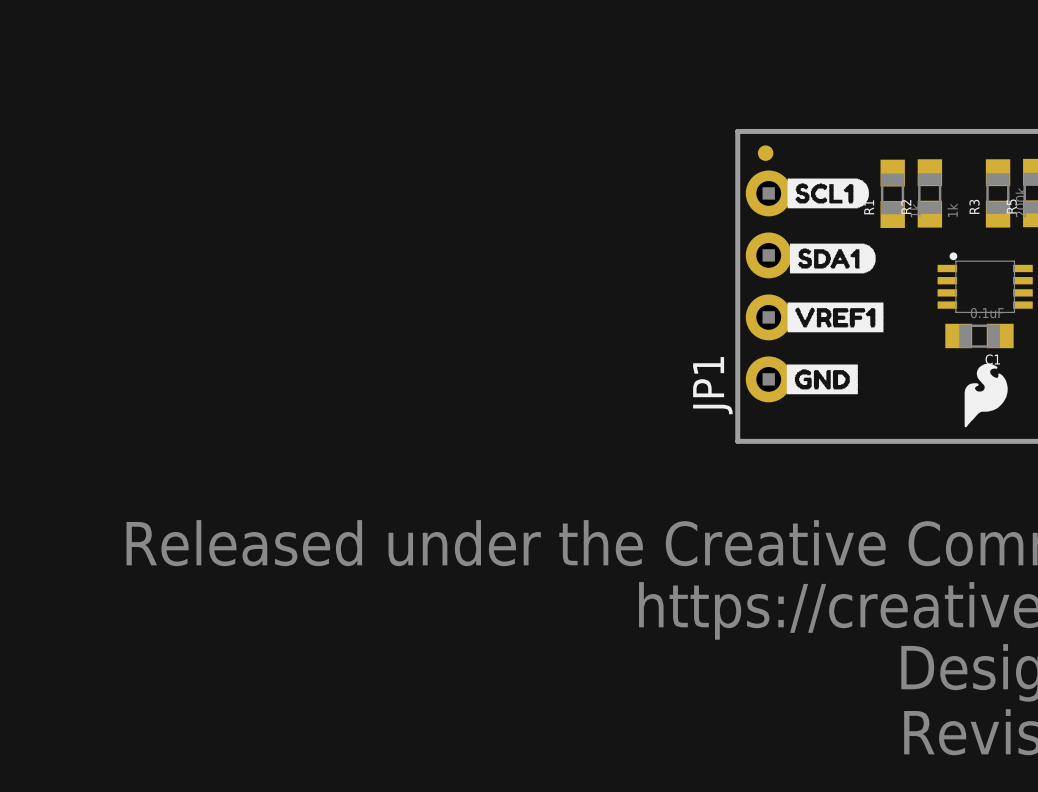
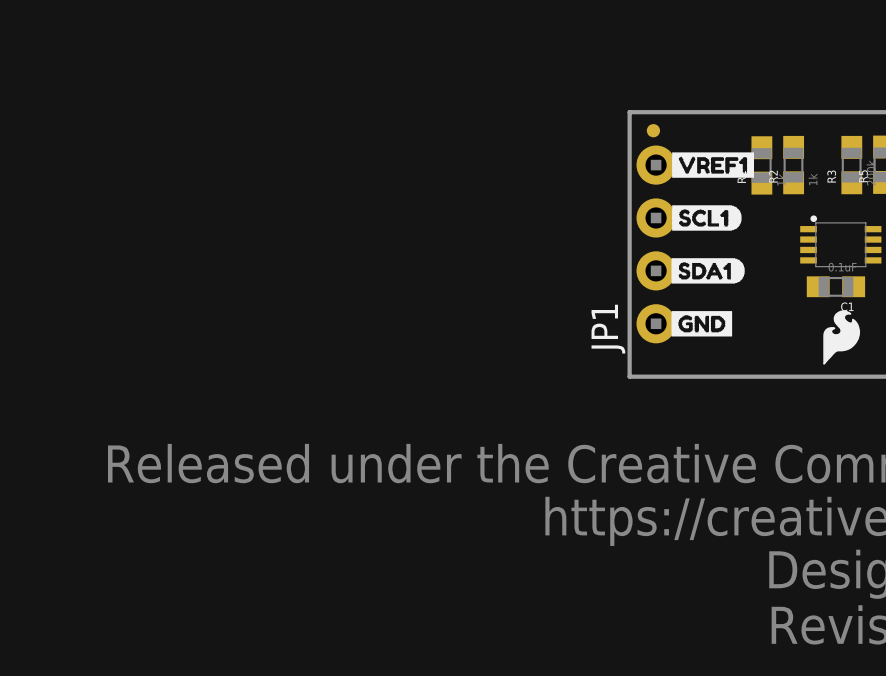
drawing position: (828, 193) -> (706, 217)
drawing position: (832, 258) -> (708, 270)
drawing position: (835, 317) -> (713, 165)

